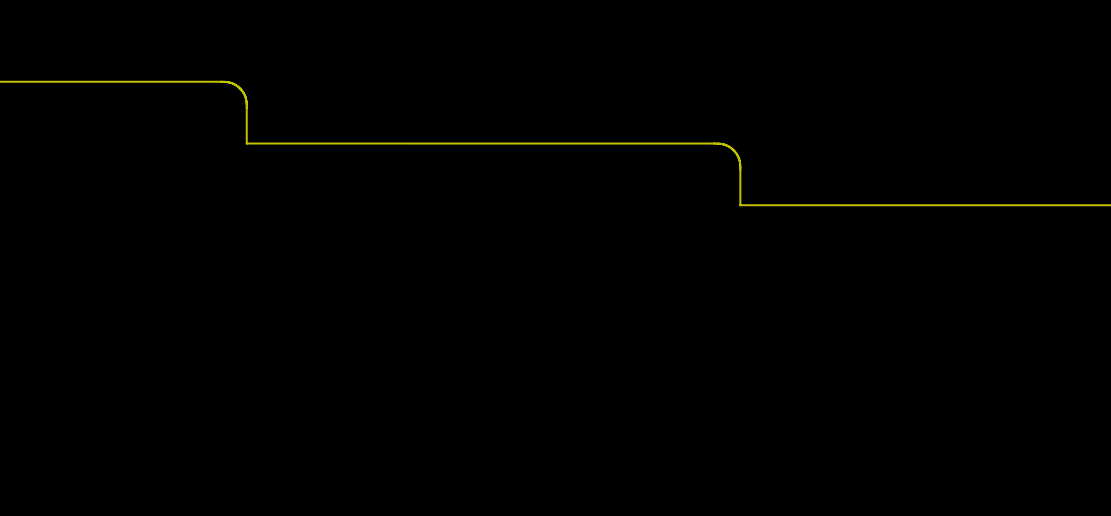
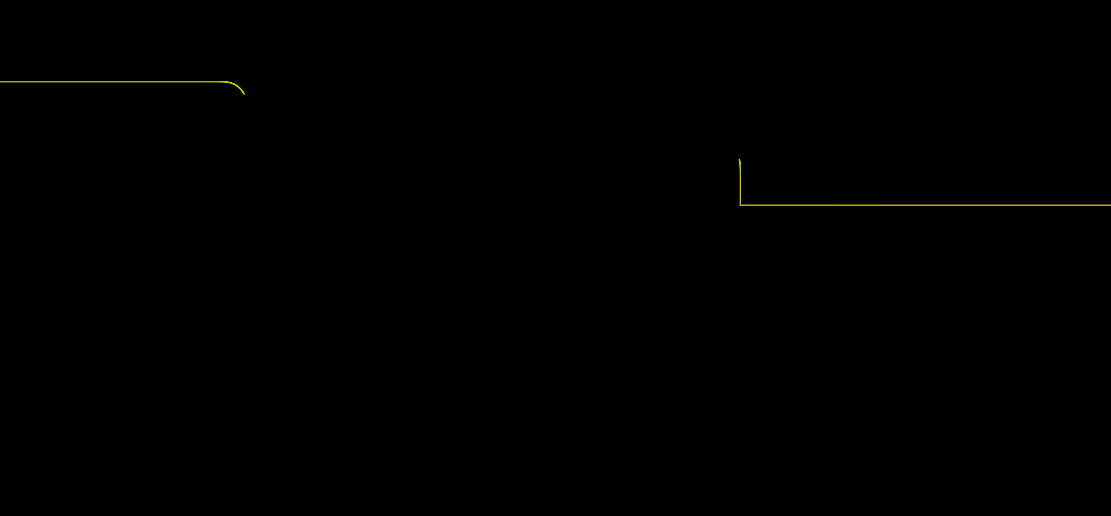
board edge: (245, 97) (246, 143) (714, 143) -> none
board edge: (714, 143) (728, 146) (737, 155) -> none

